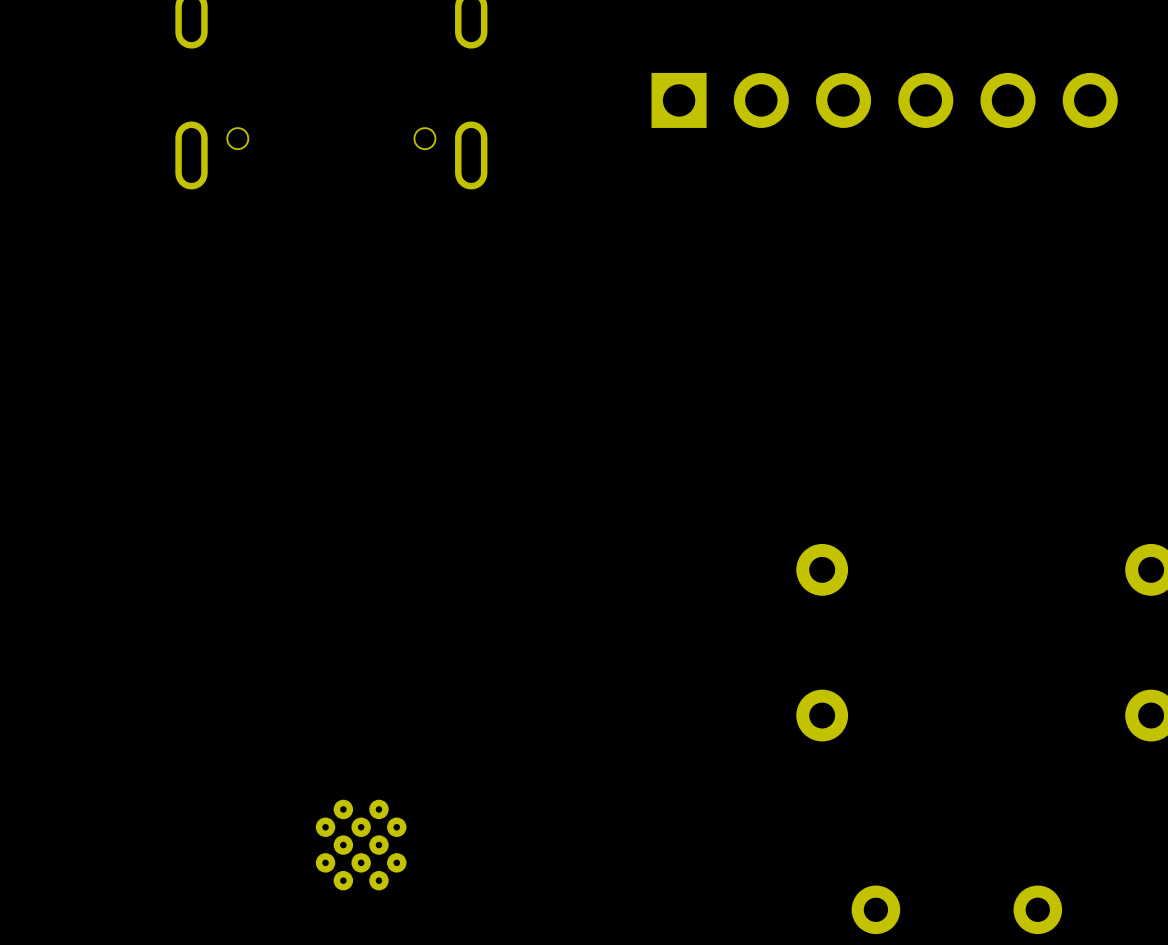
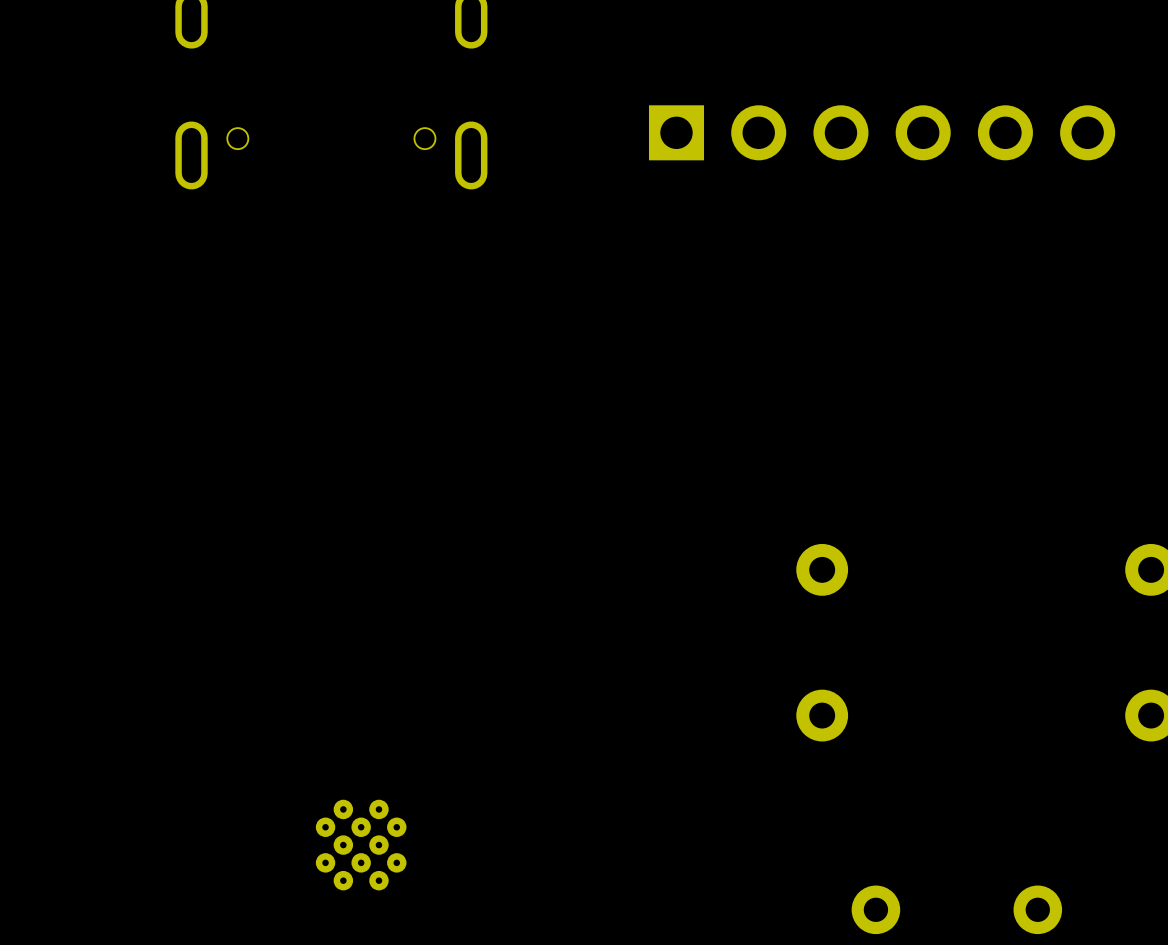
part position: (884, 100) -> (882, 132)

